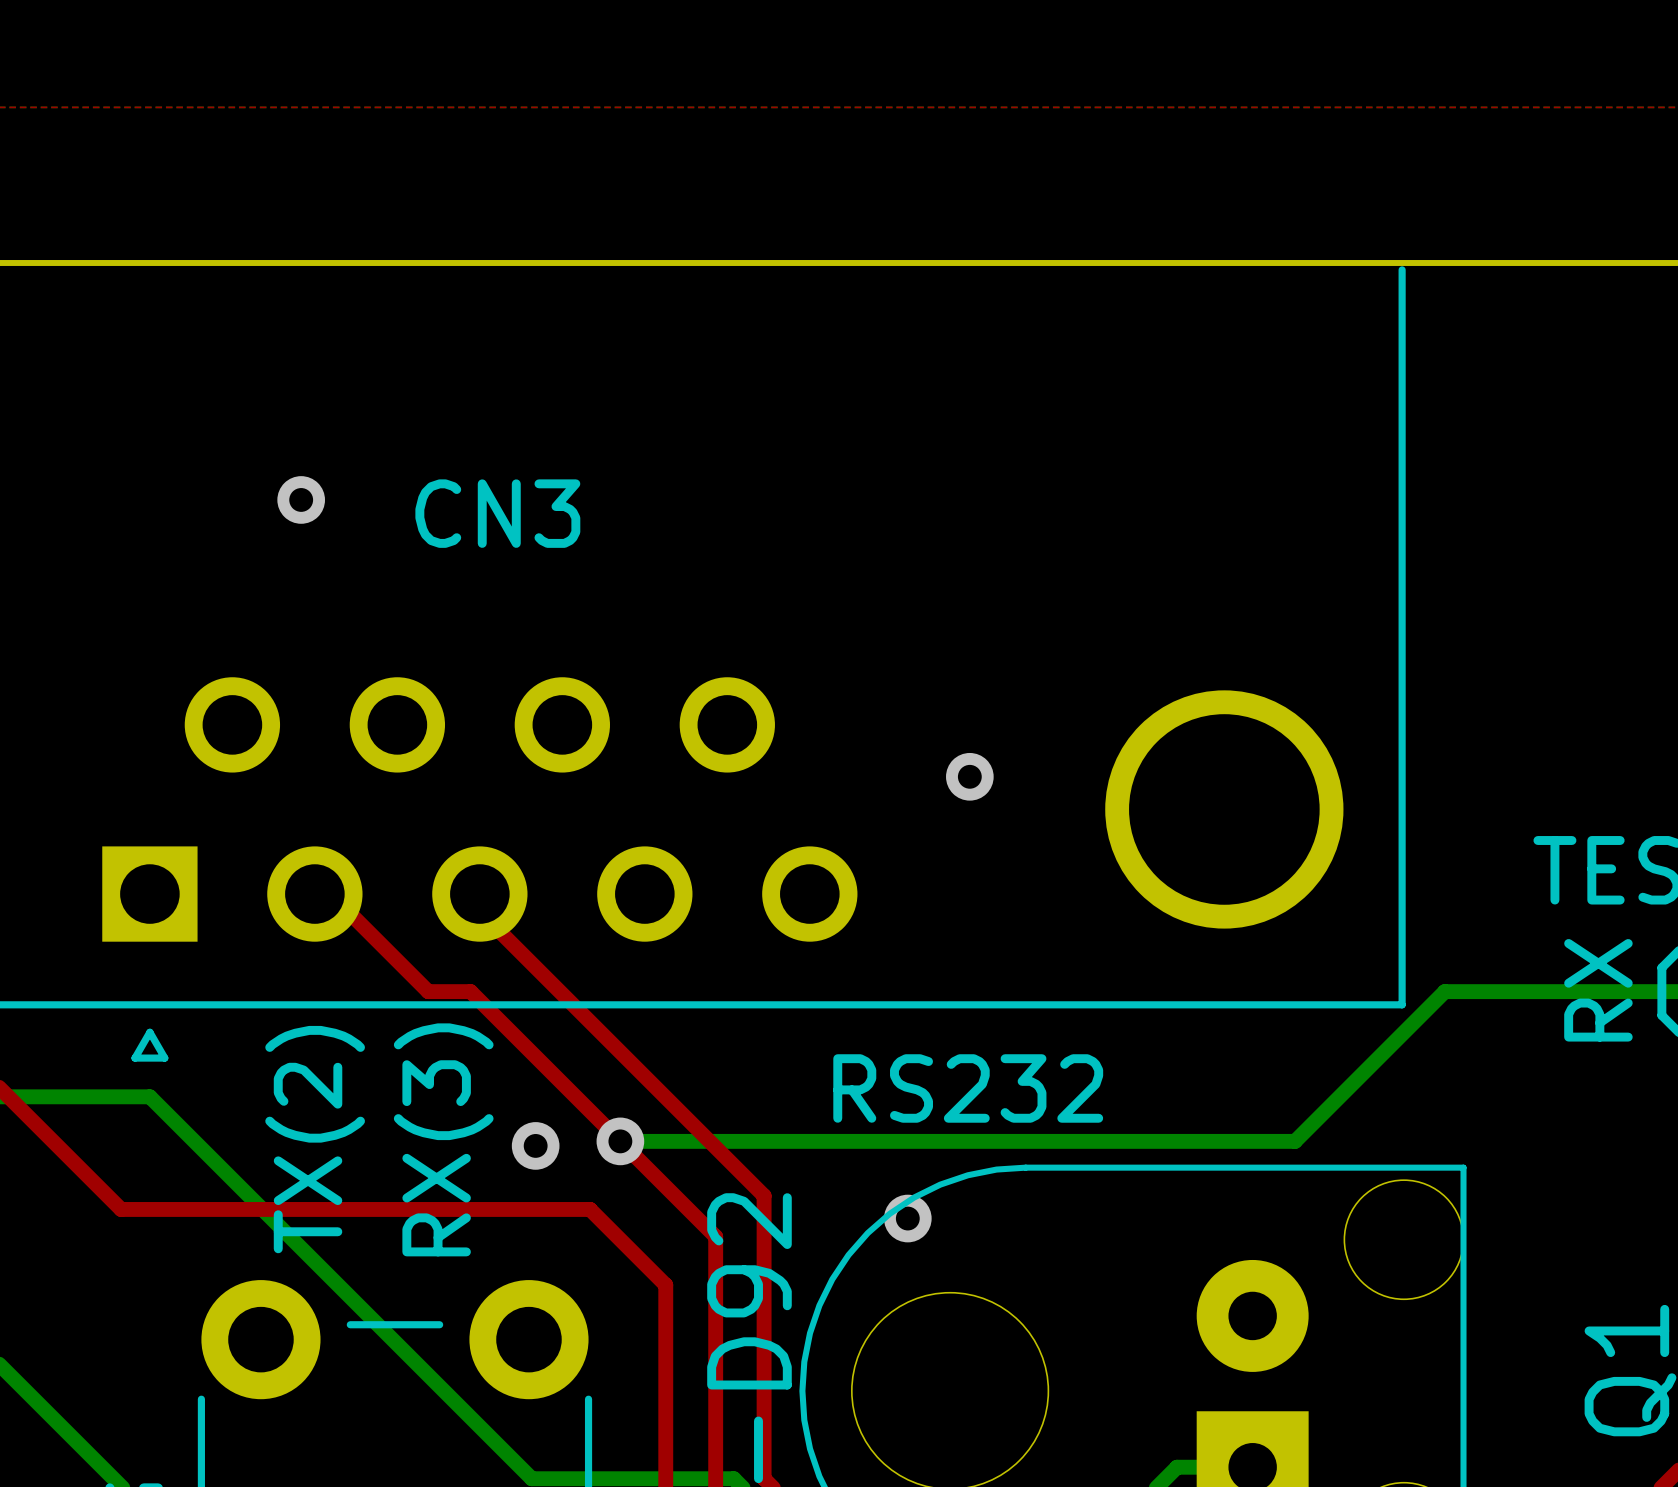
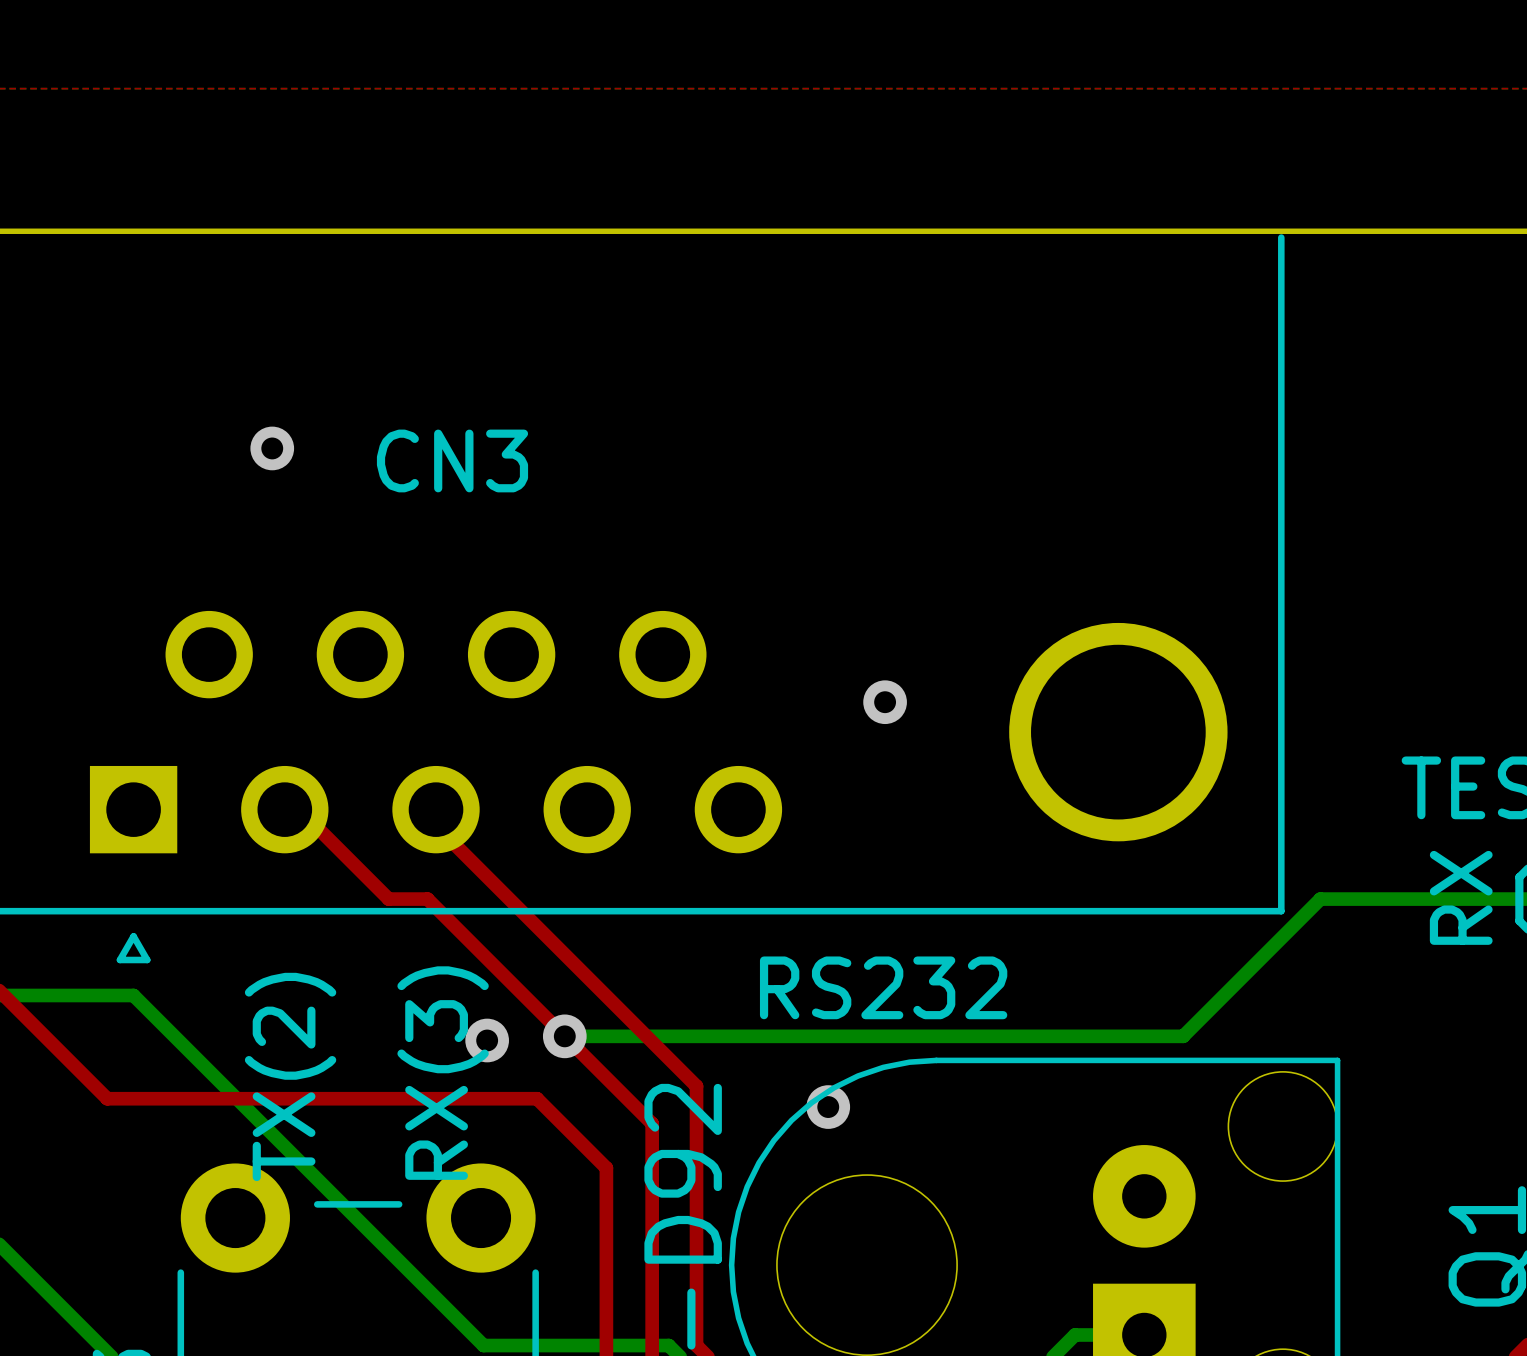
CN3 text position: TX(2) (315, 1139) -> TX(2) (290, 1076)
CN3 text position: RX(3) (443, 1139) -> RX(3) (443, 1073)

